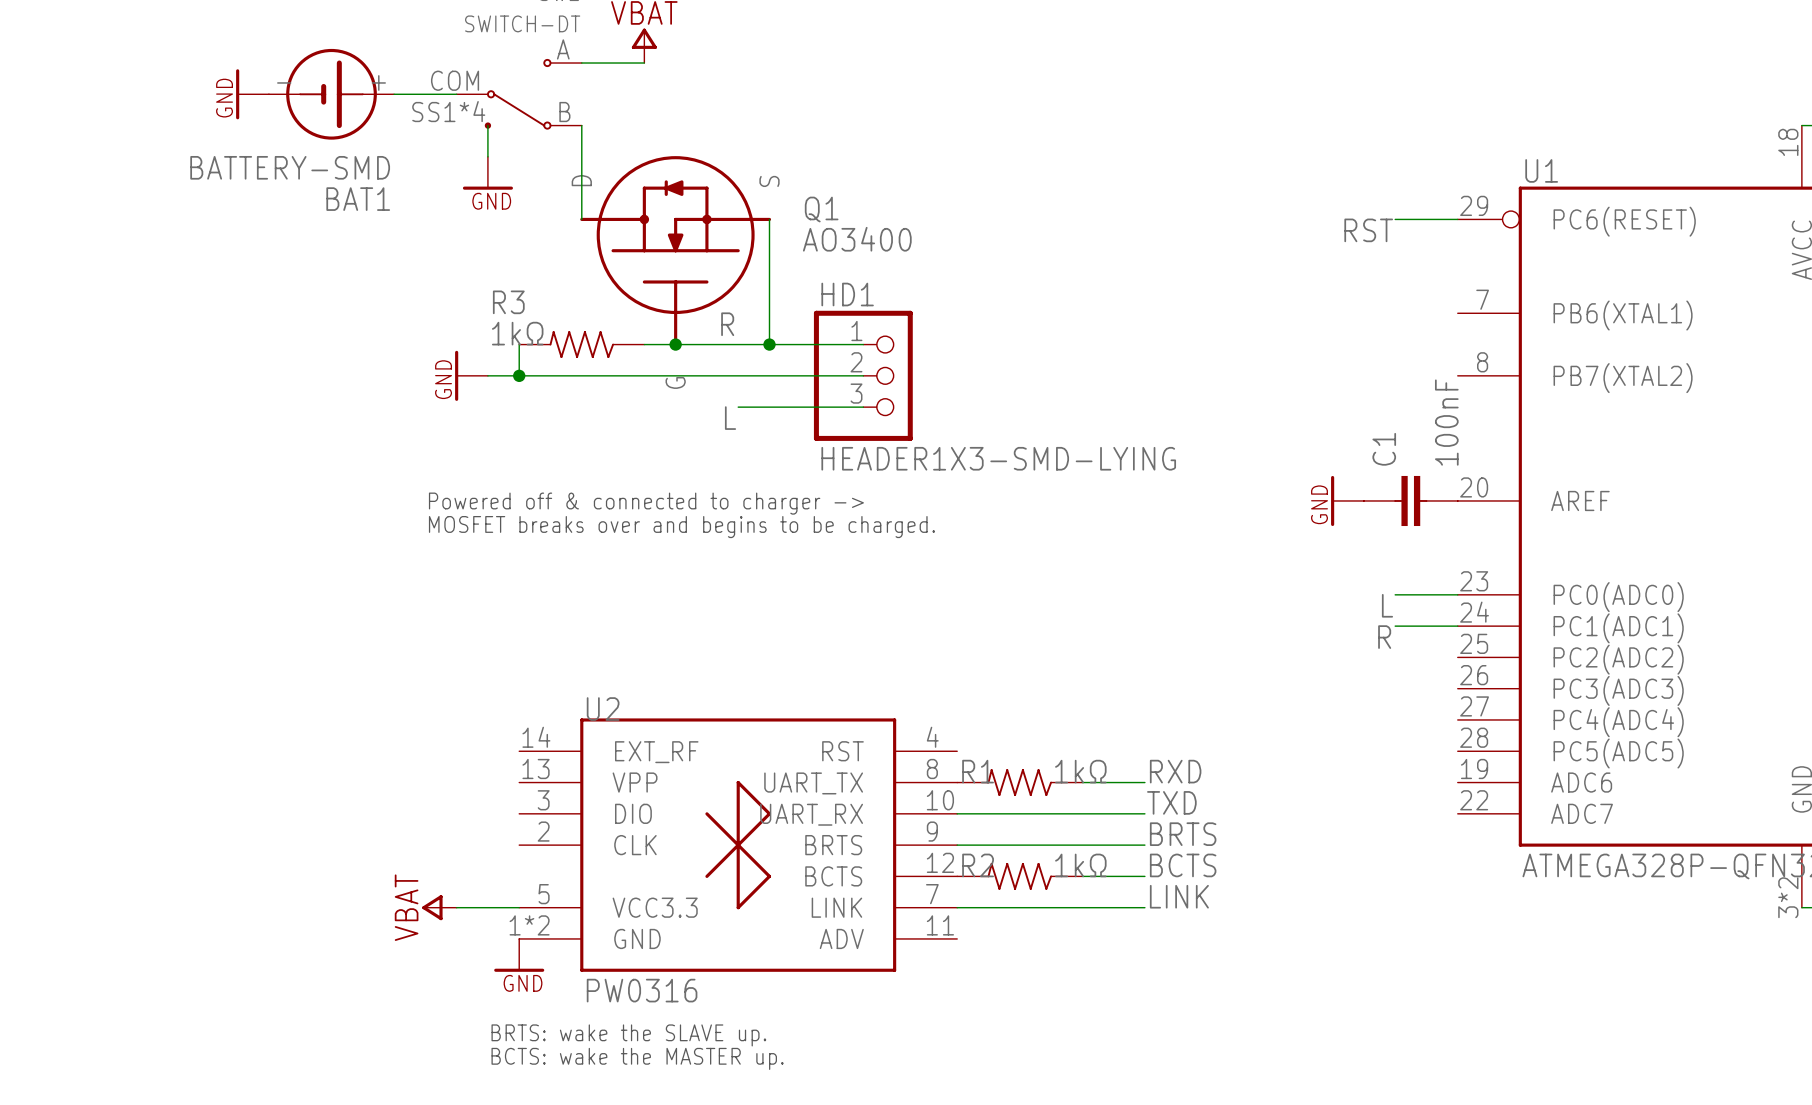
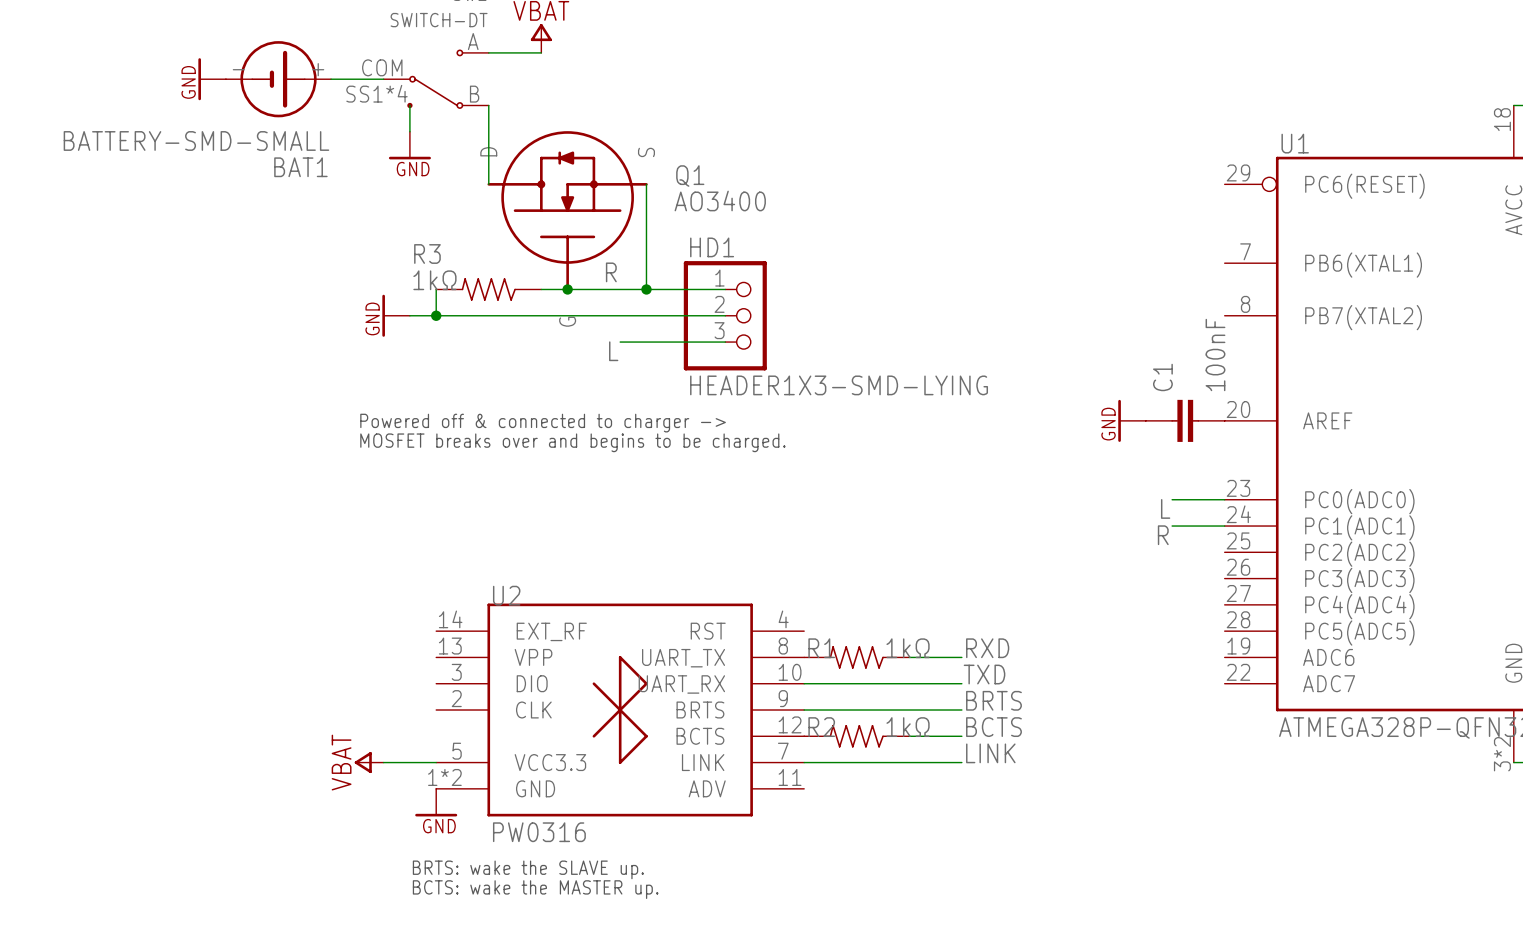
BAT1 value: BATTERY-SMD (290, 167) -> BATTERY-SMD-SMALL (196, 140)
wire: (1395, 219) (1457, 219) -> none
label: RST (1368, 230) -> none

